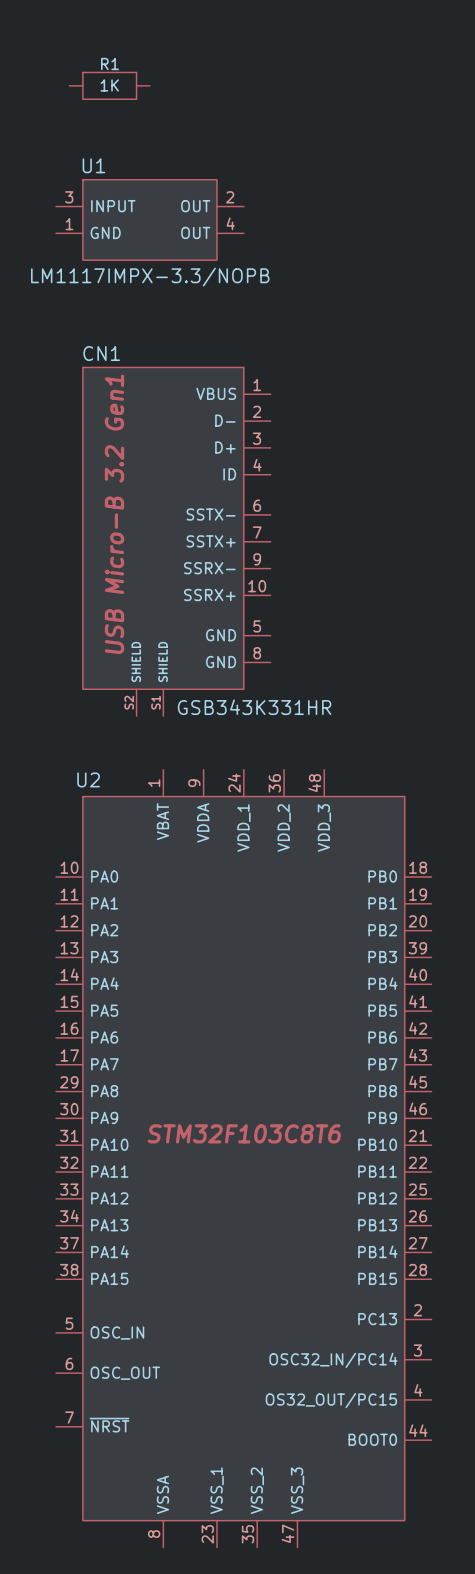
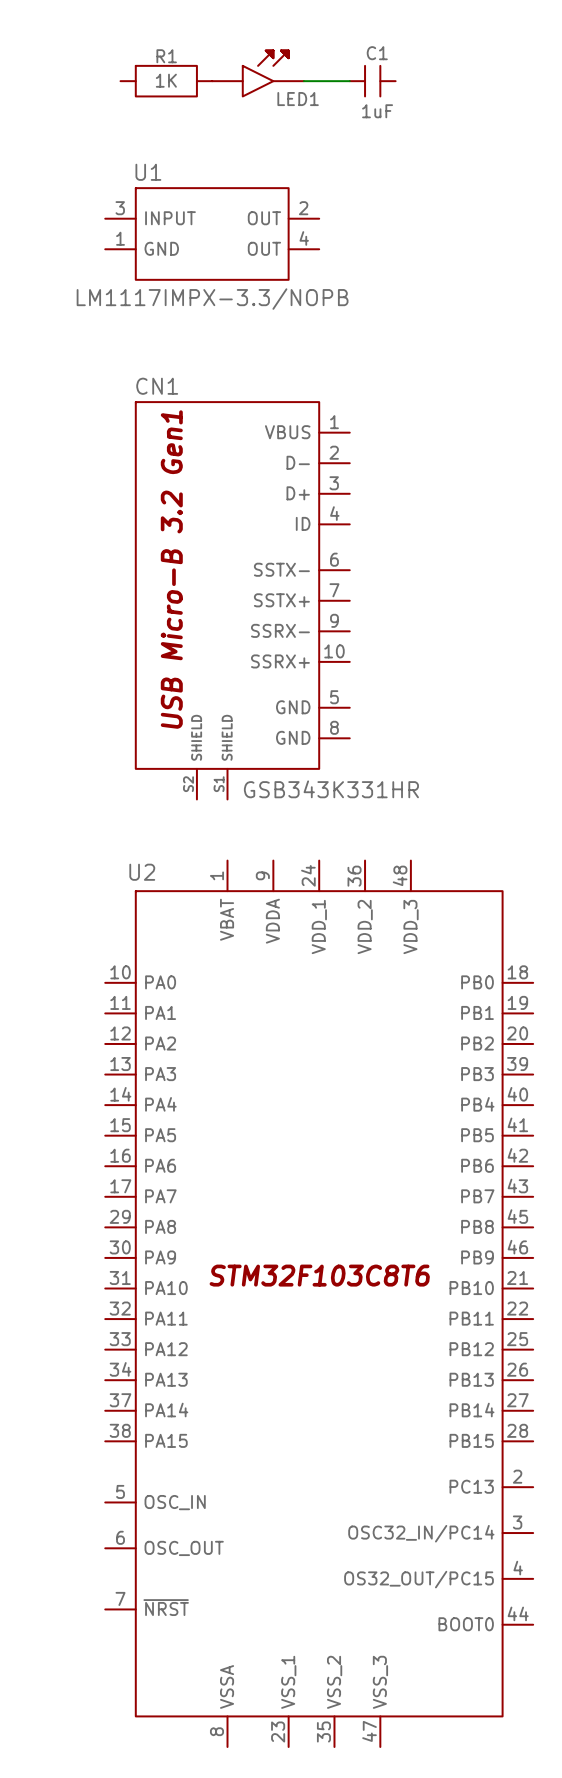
LED1: none -> (258, 73)
wire: none -> (303, 81) (349, 81)
C1: none -> 1uF (372, 81)

